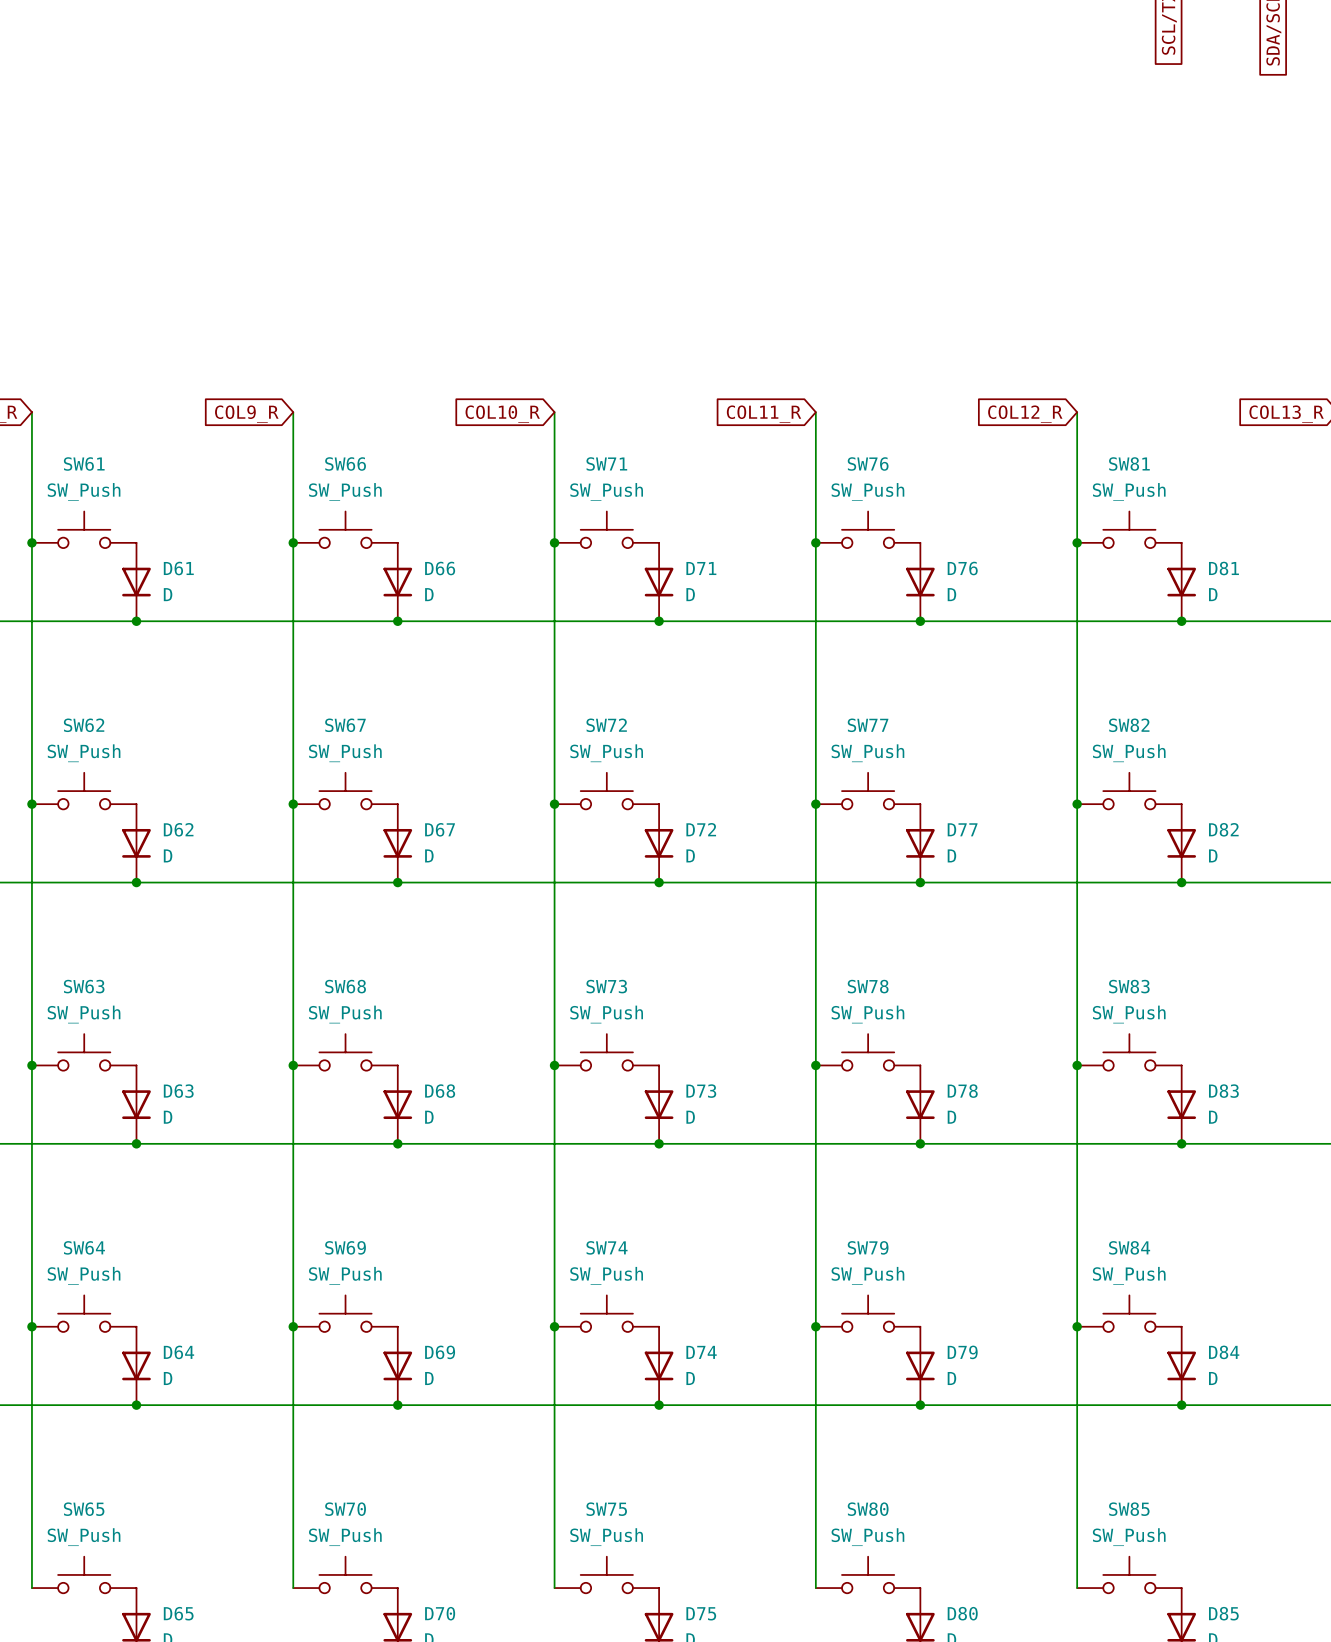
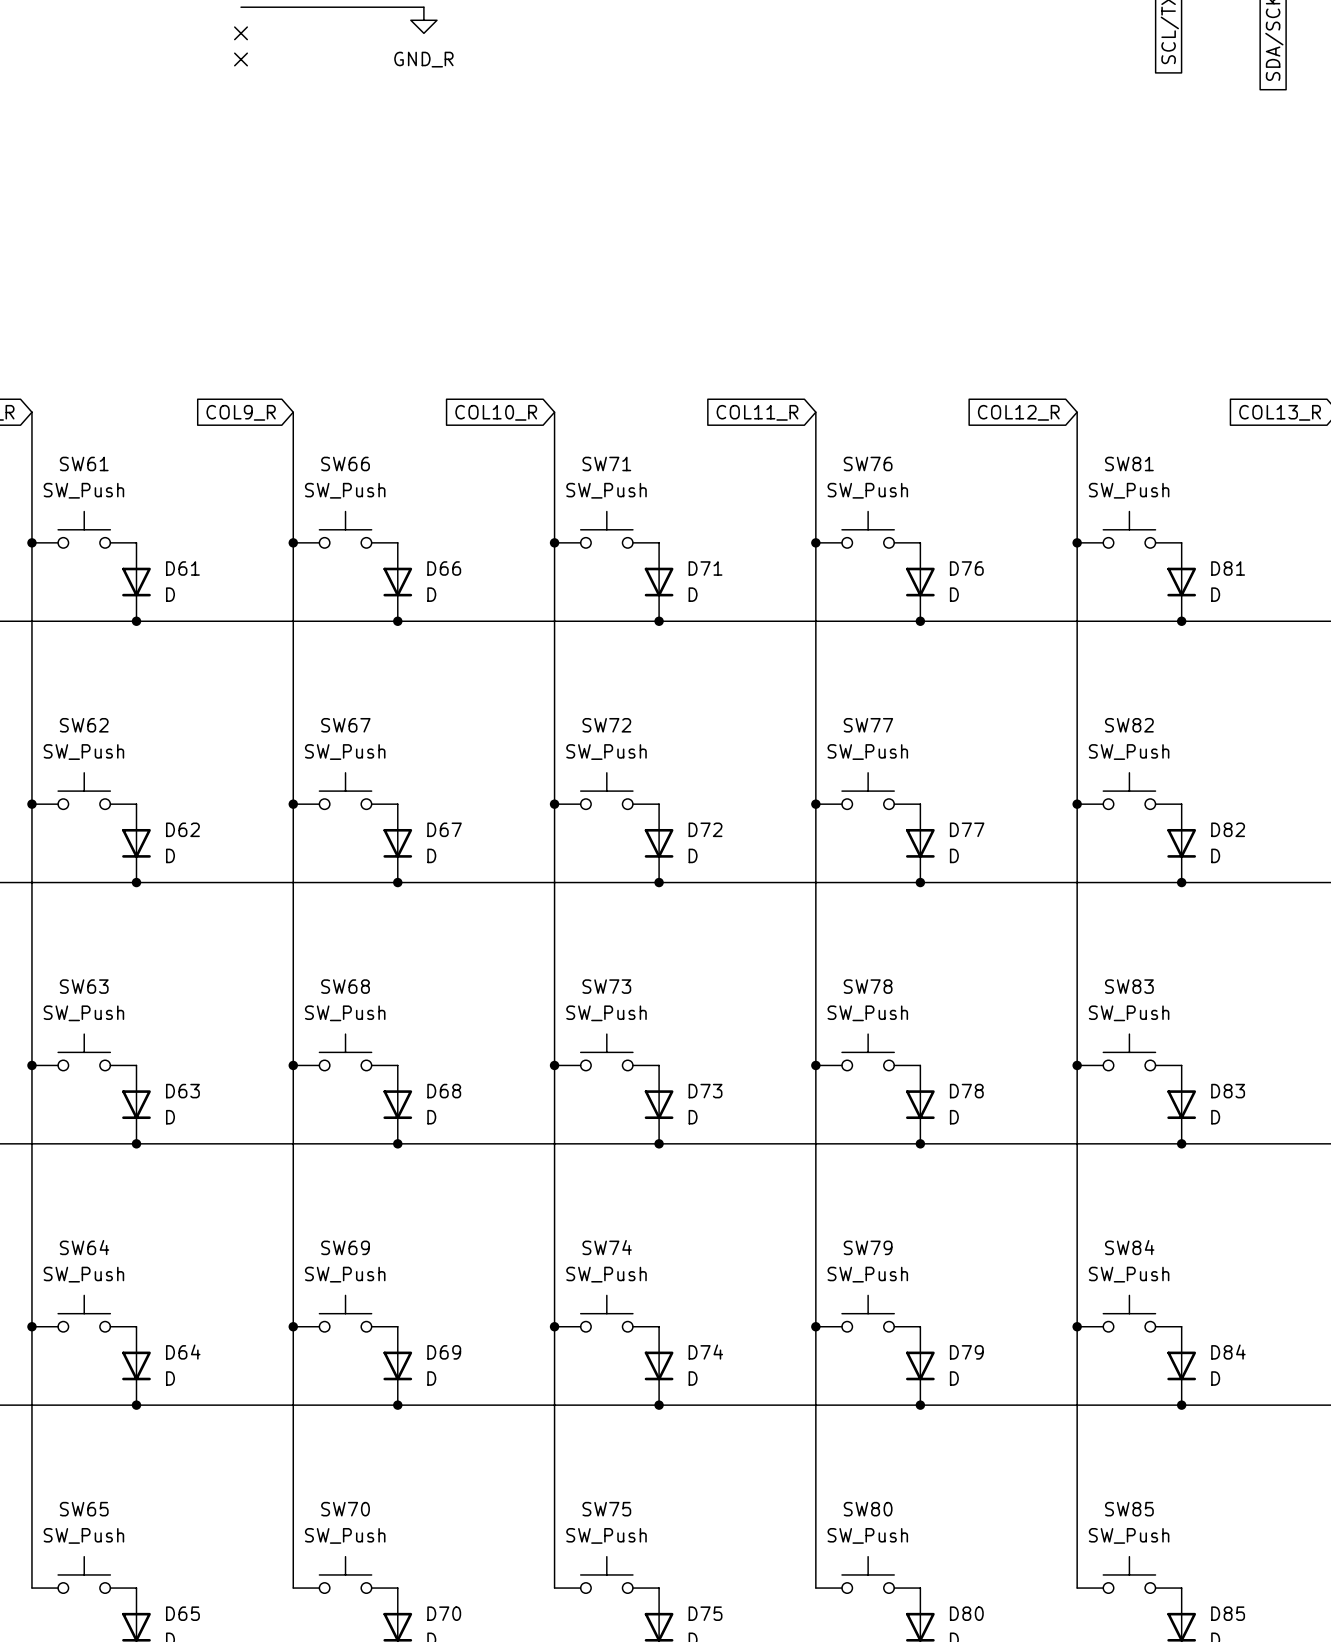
wire: none -> (241, 7) (423, 7)
power symbol: none -> GND_R (423, 20)
no-connect mark: none -> (241, 33)
no-connect mark: none -> (241, 59)

